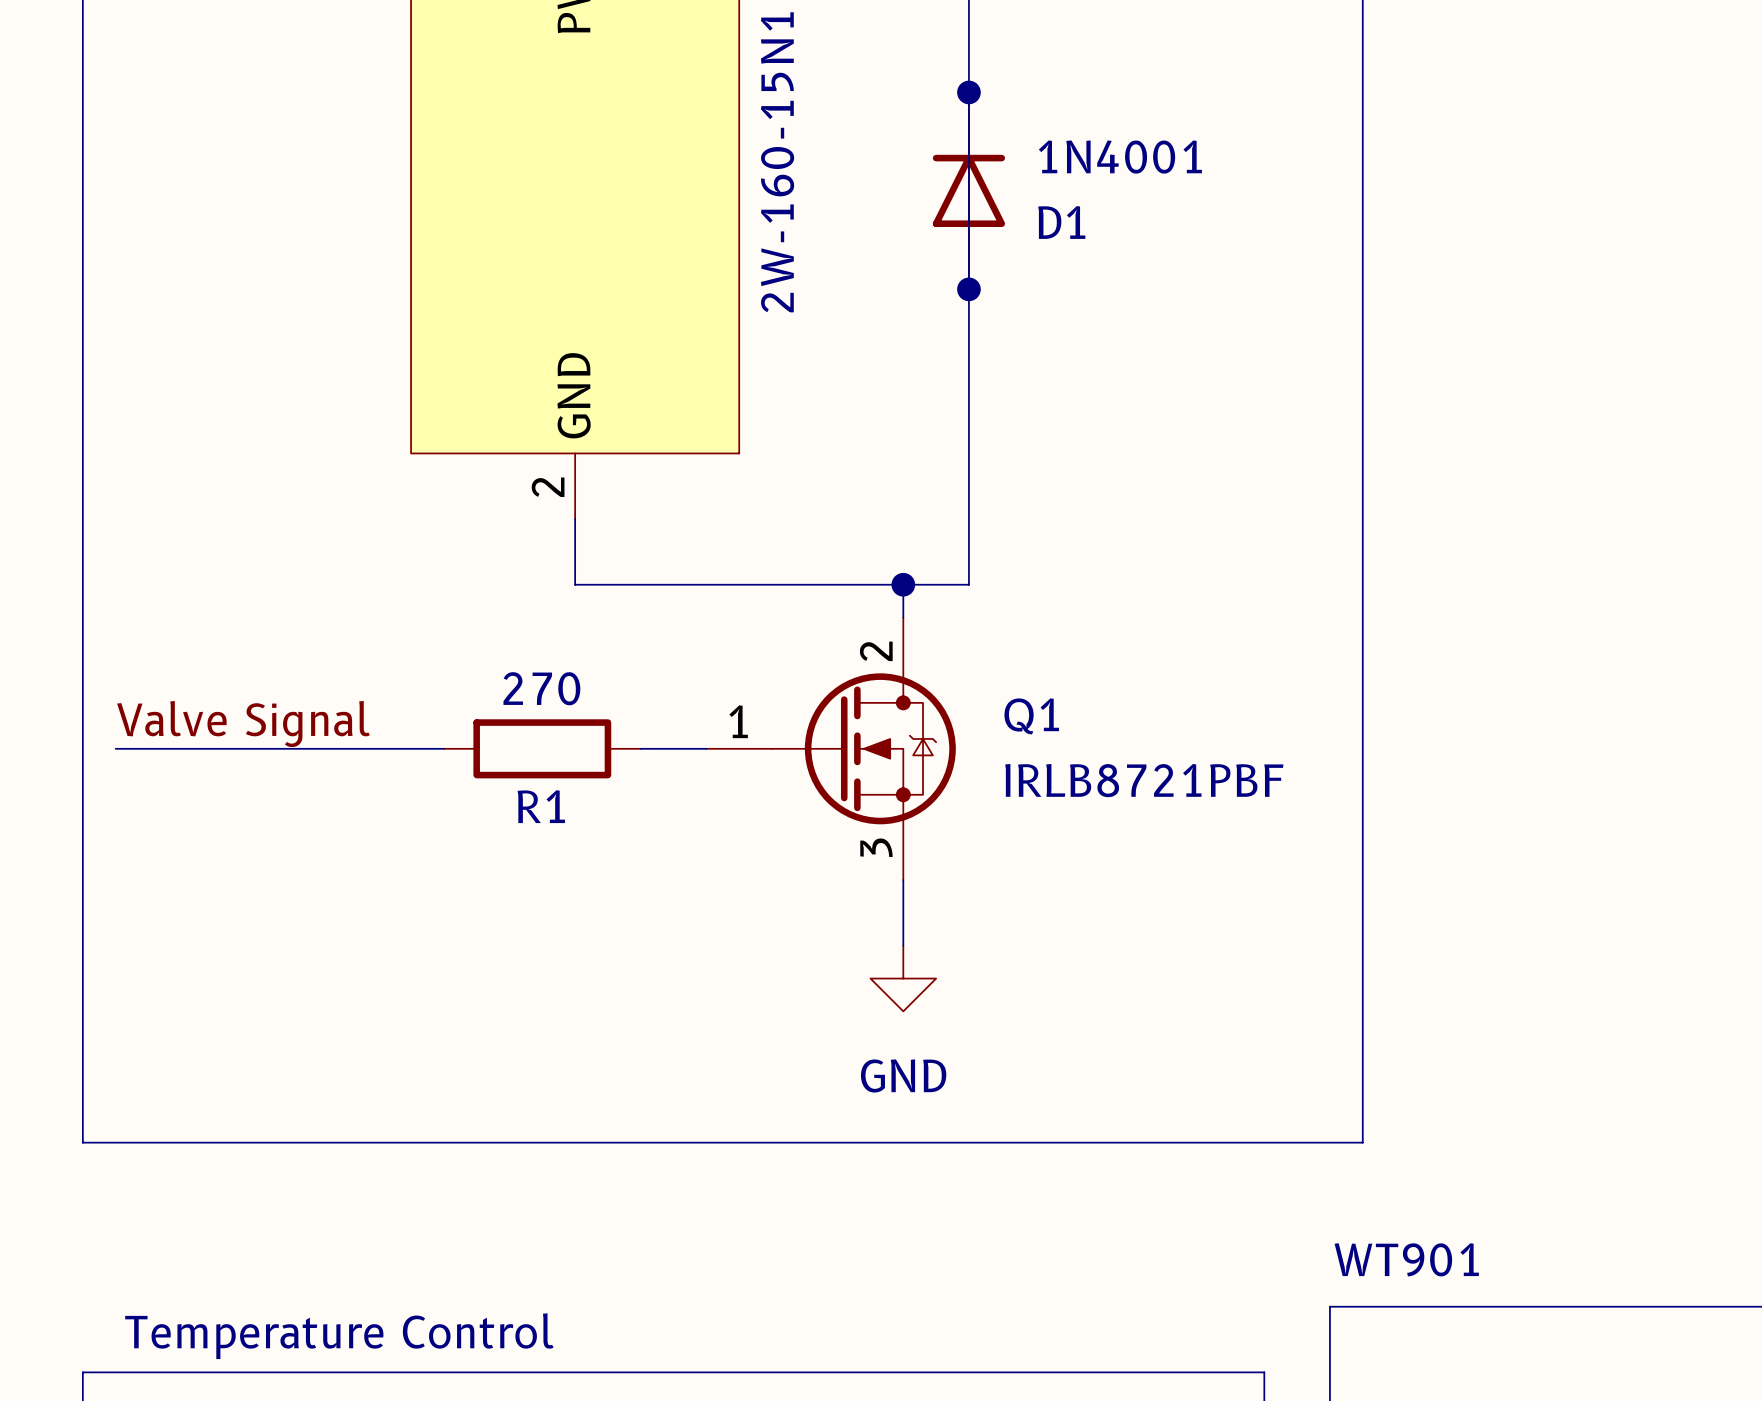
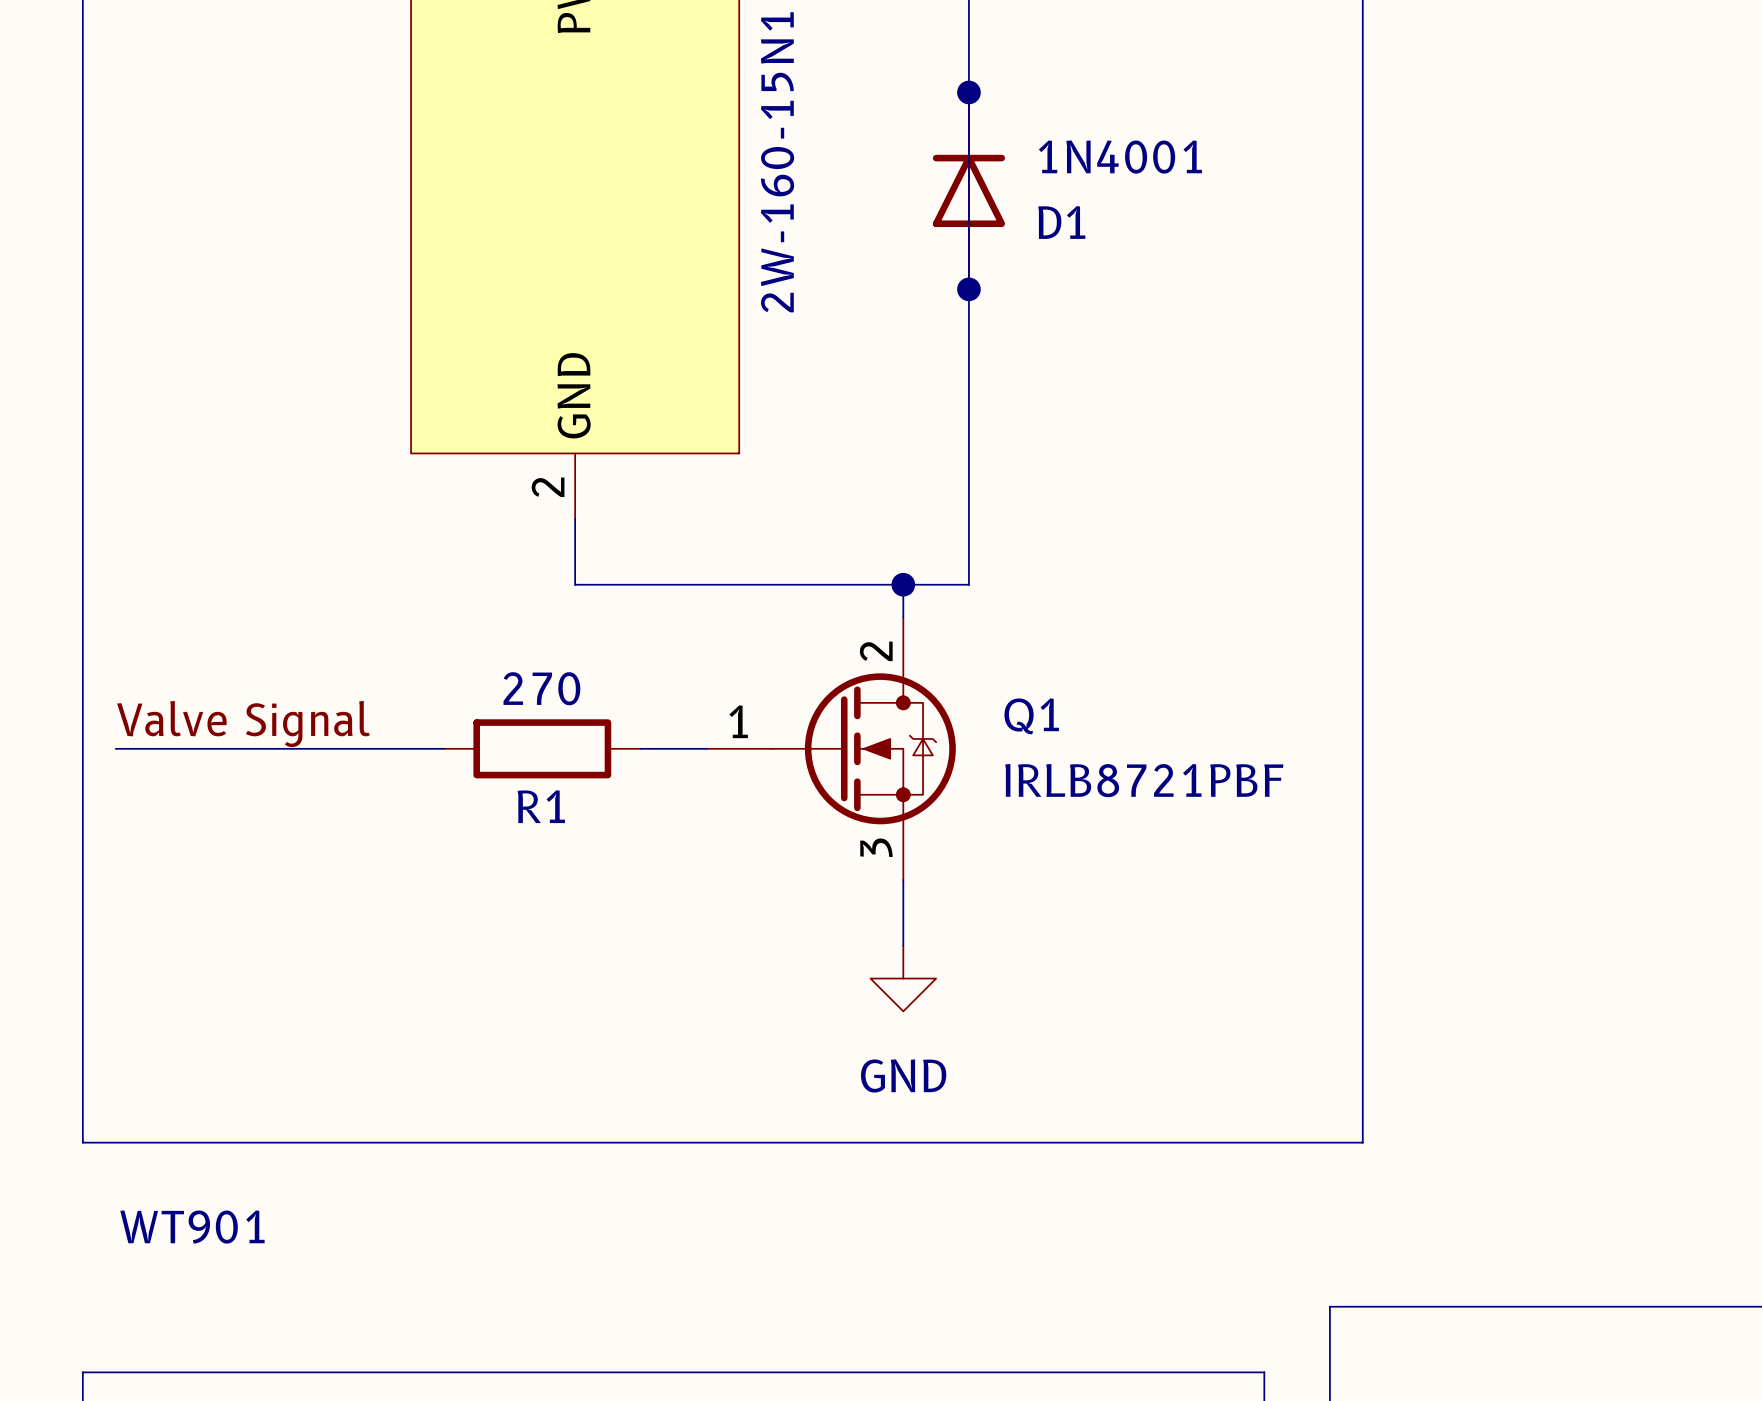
text: none -> WT901 (192, 1227)
text: WT901 (1406, 1259) -> none
text: Temperature Control (339, 1336) -> none

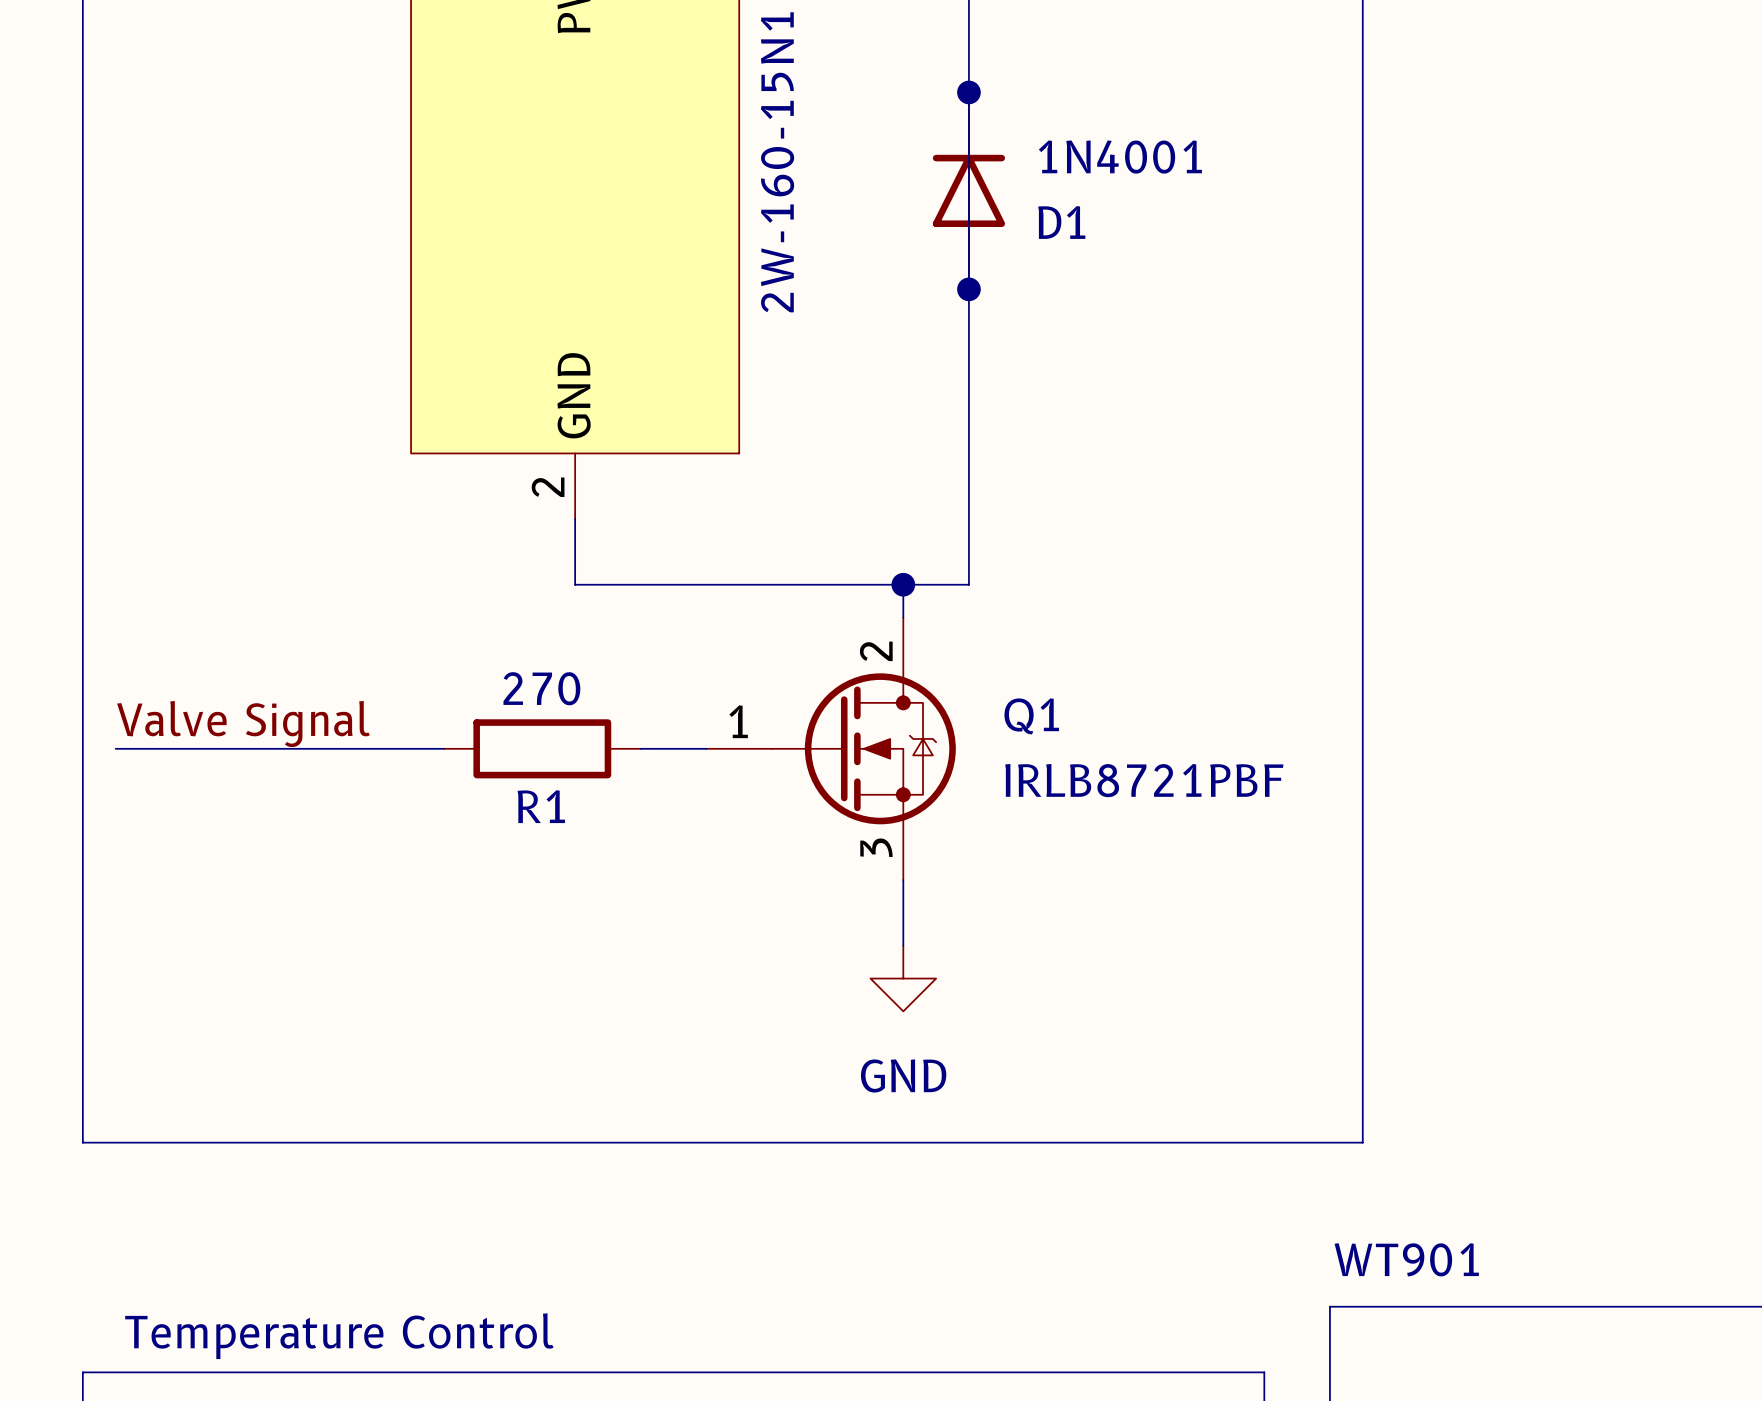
text: WT901 (192, 1227) -> none
text: none -> WT901 (1406, 1259)
text: none -> Temperature Control (339, 1336)

